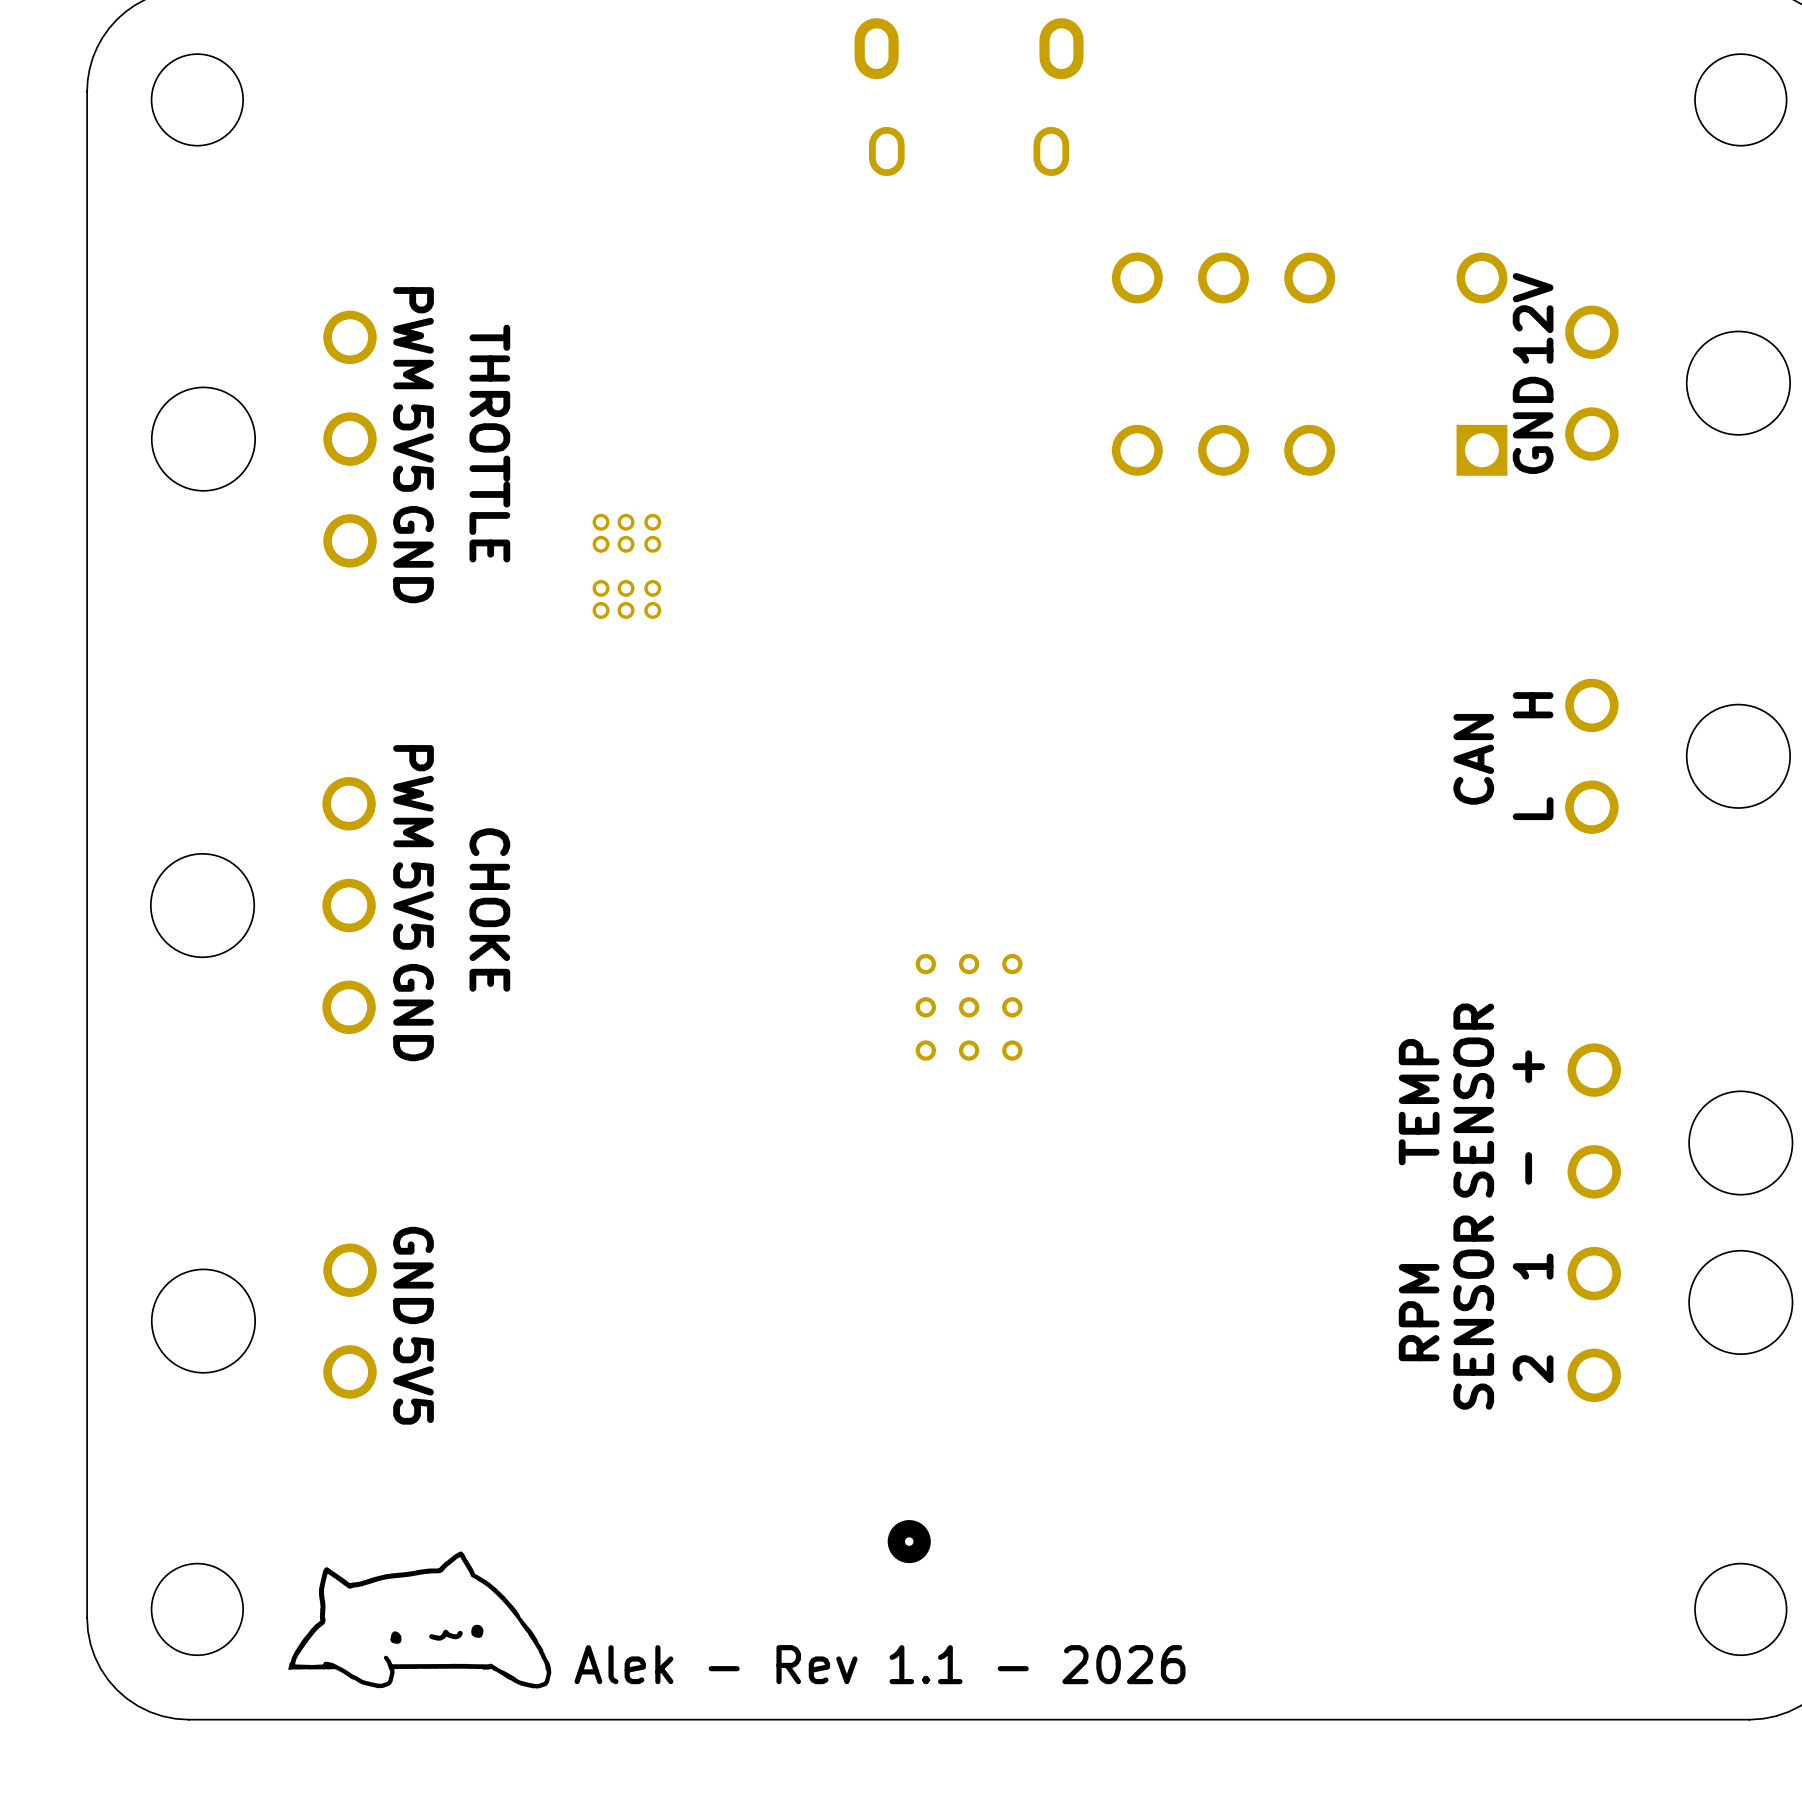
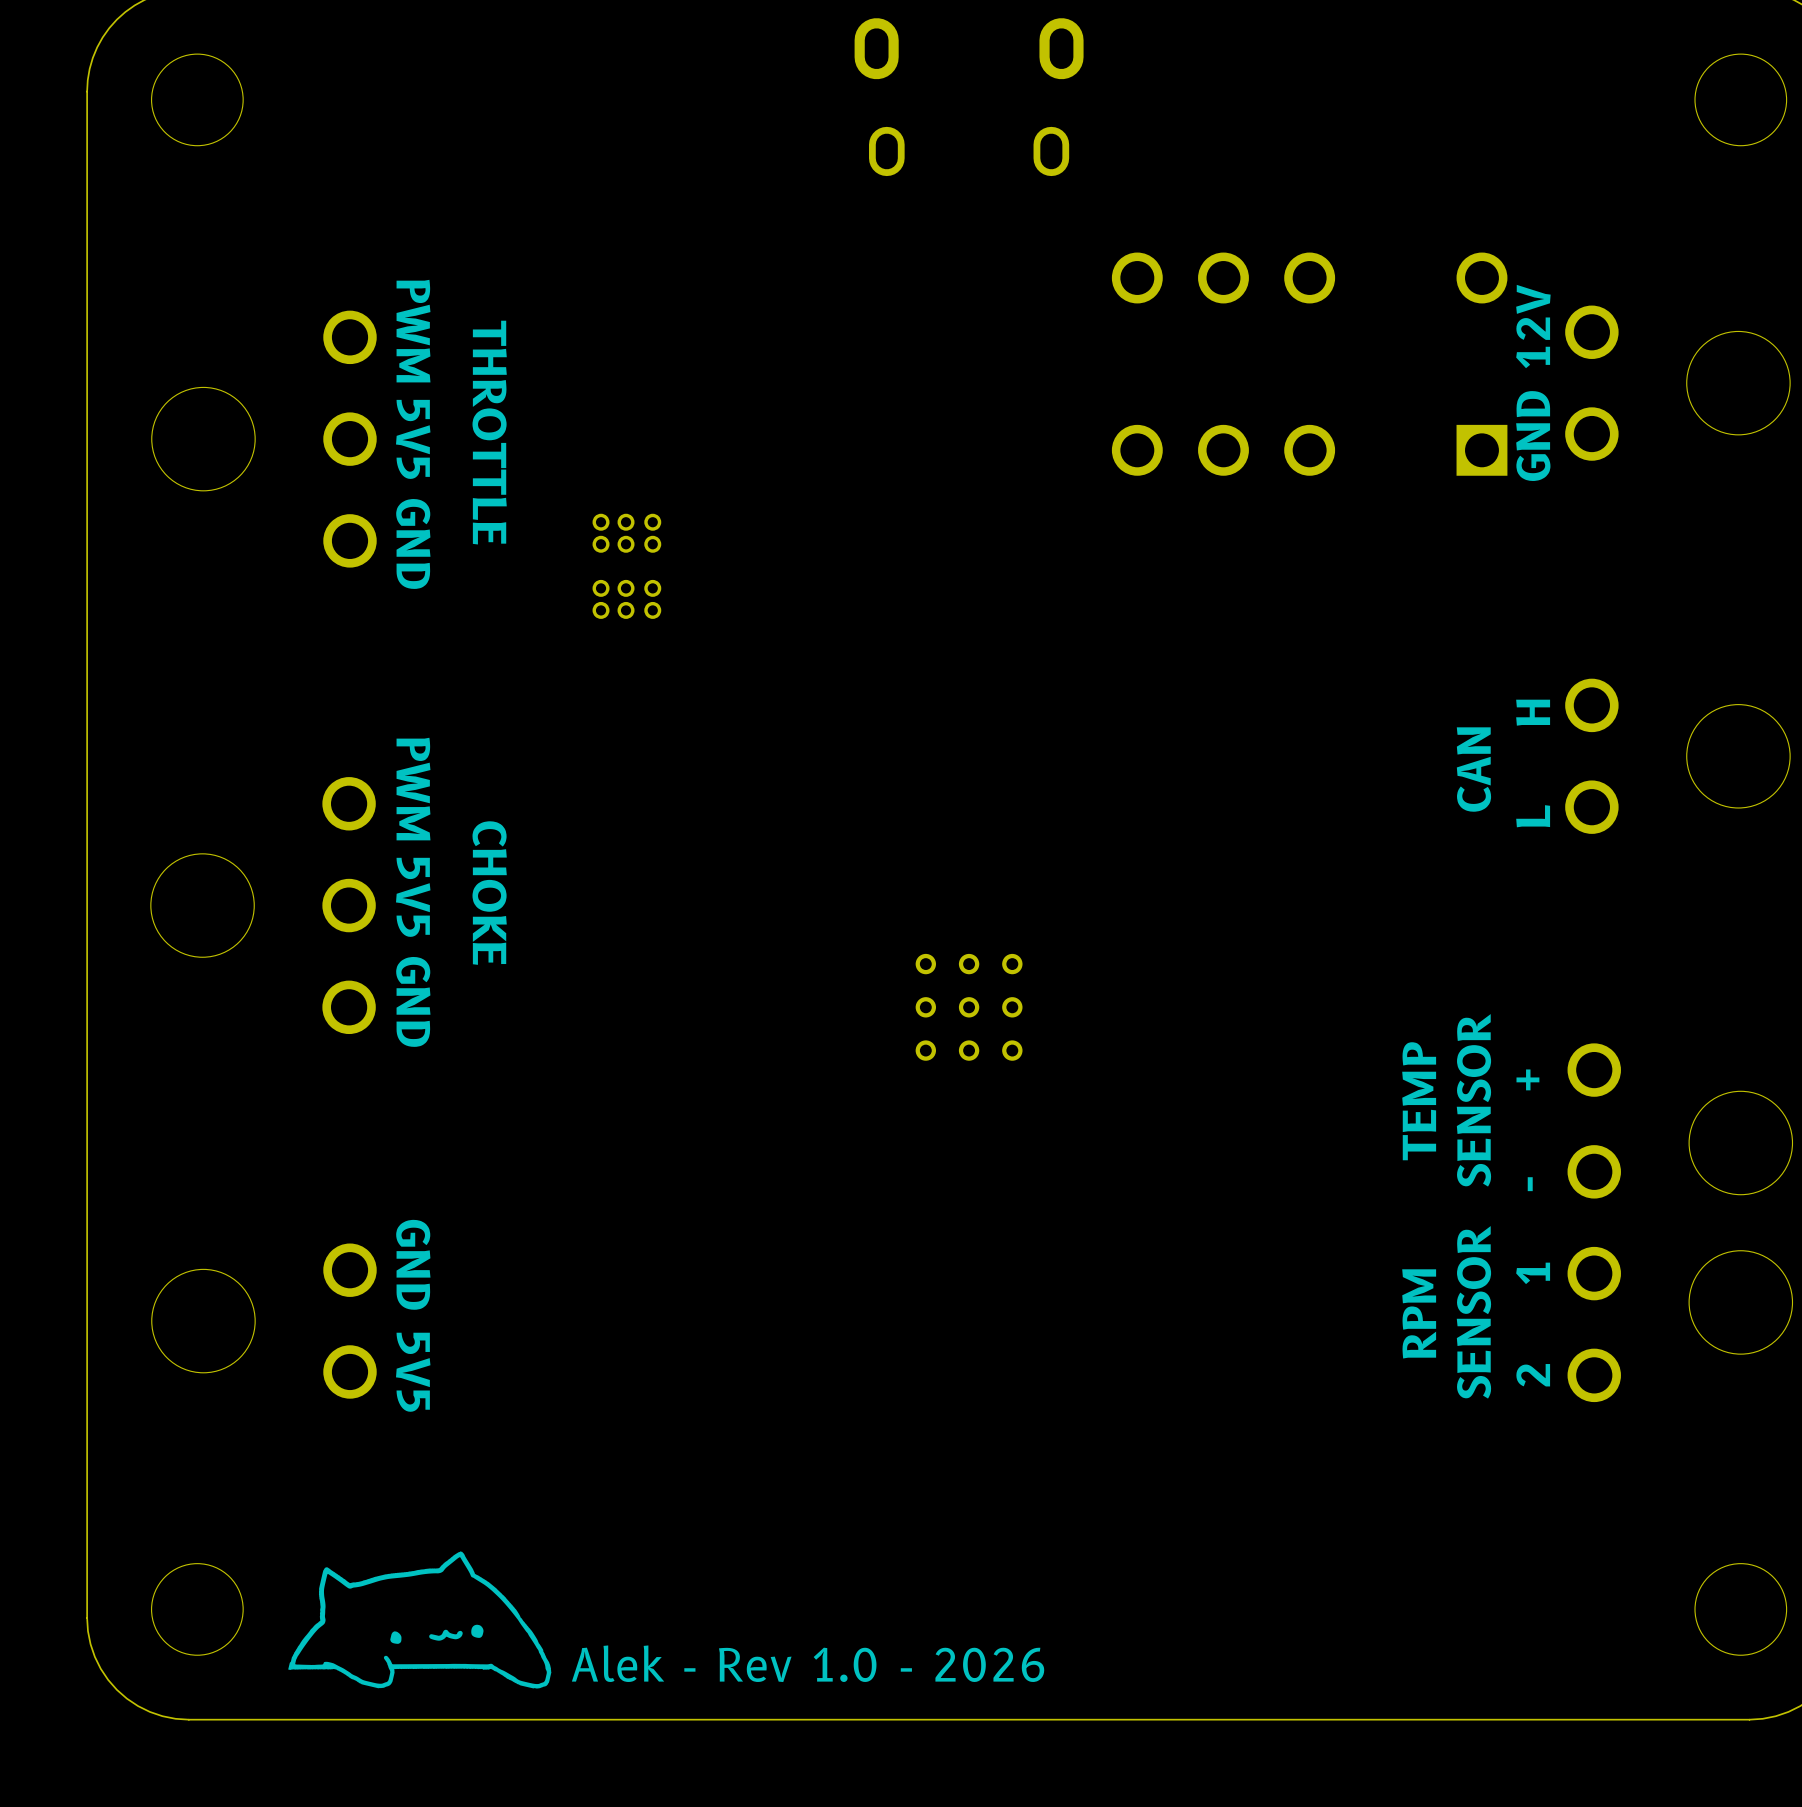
part: (909, 1541) -> none
text: Alek - Rev 1.1 - 2026 (880, 1664) -> Alek - Rev 1.0 - 2026 (808, 1663)

